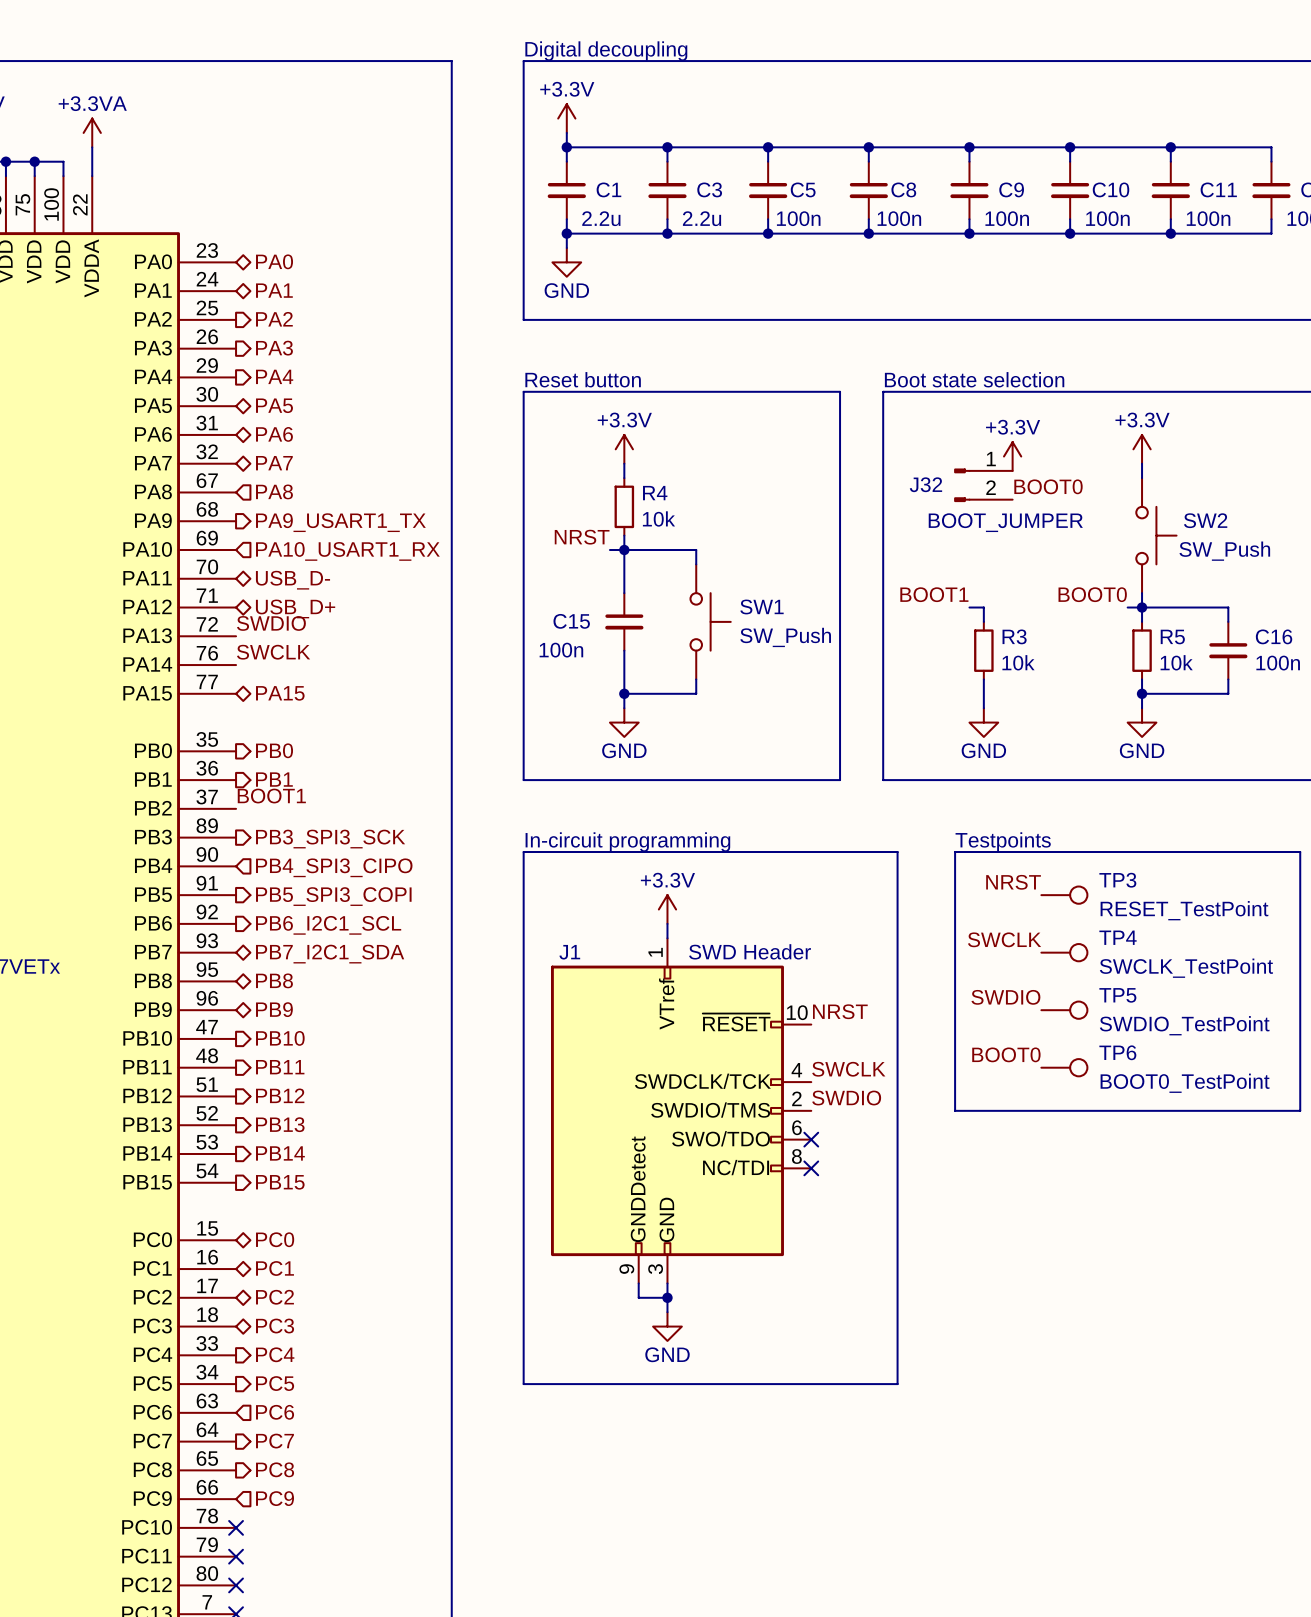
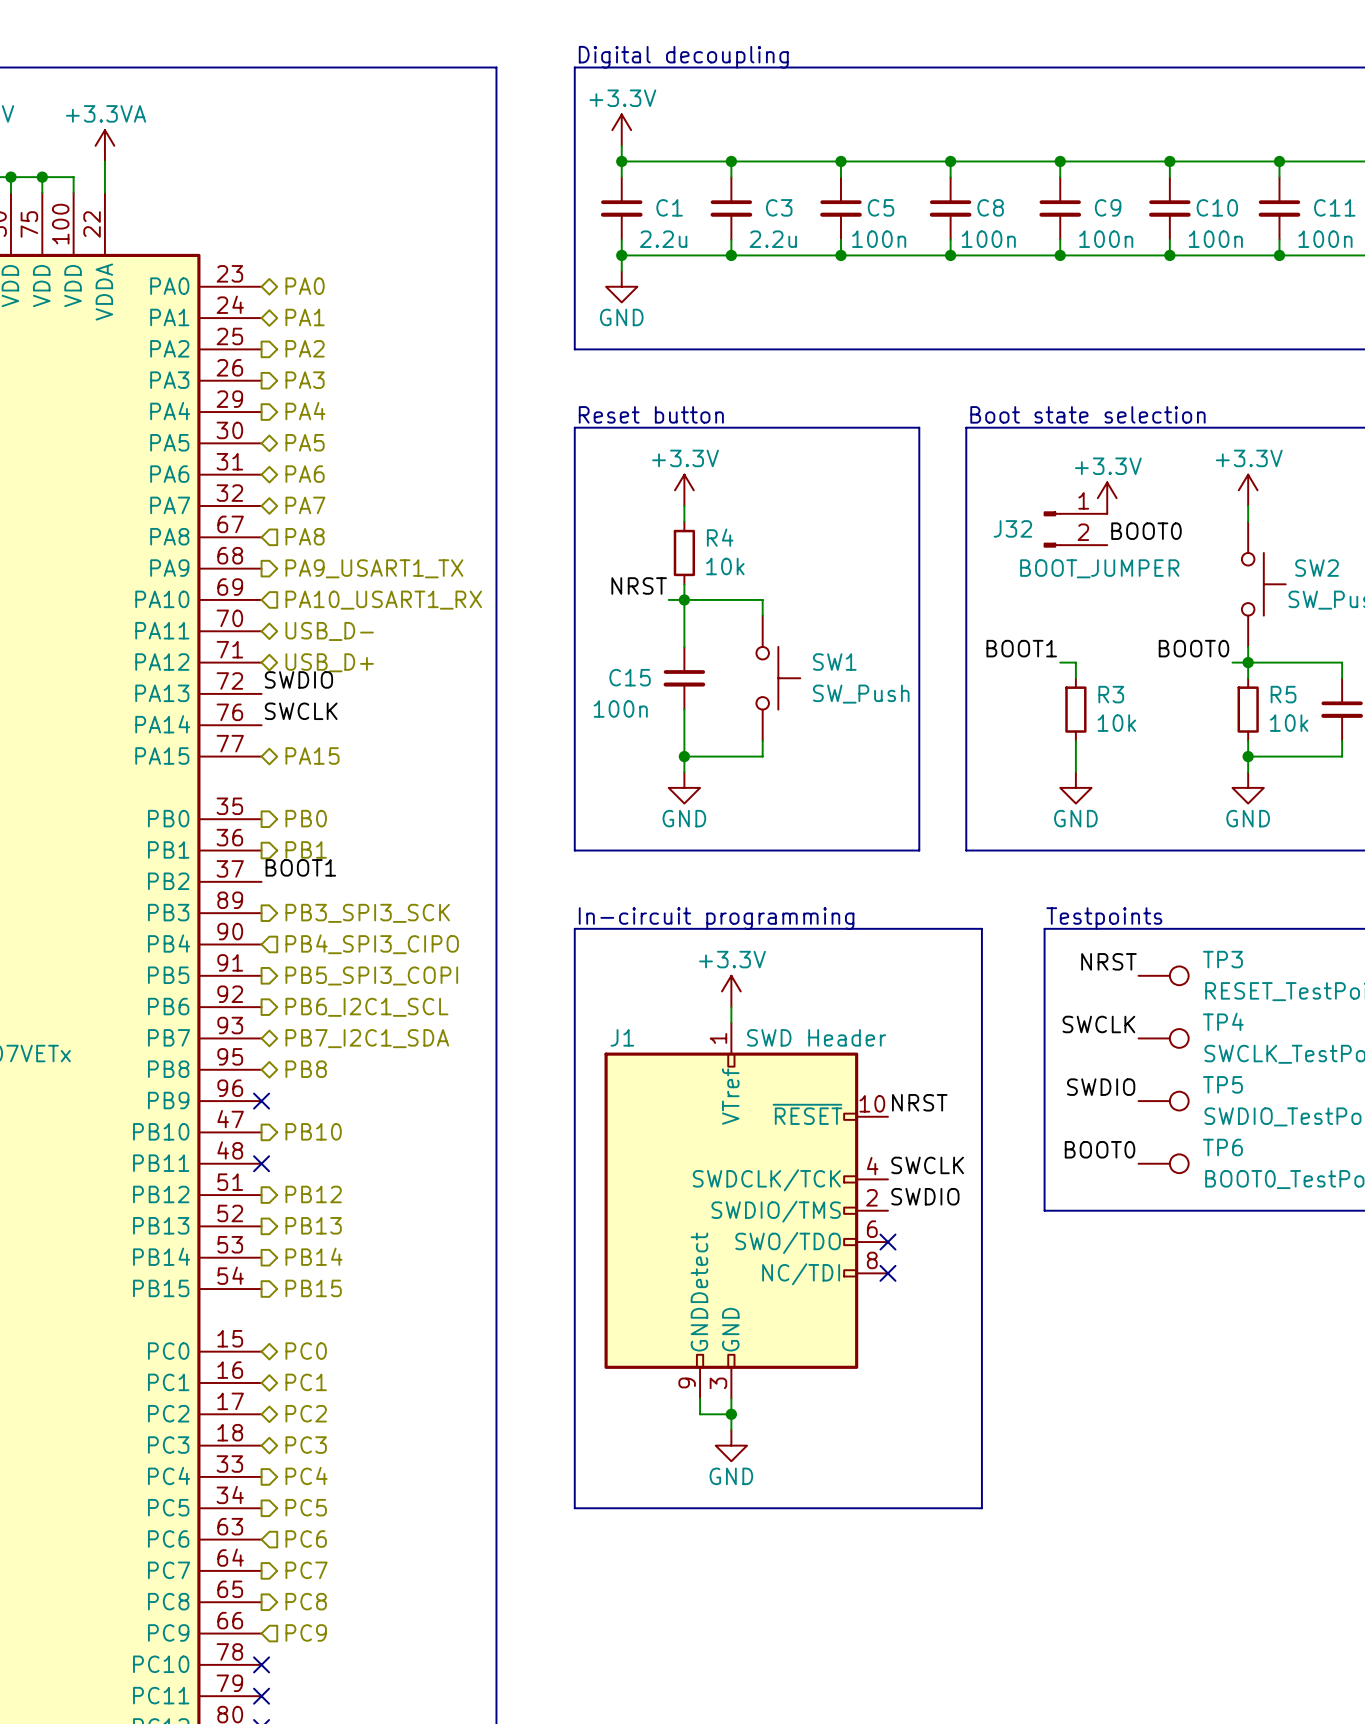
hierarchical label: PB9 (274, 1009) -> none
no-connect mark: none -> (261, 1101)
no-connect mark: none -> (261, 1163)
hierarchical label: PB11 (280, 1067) -> none

